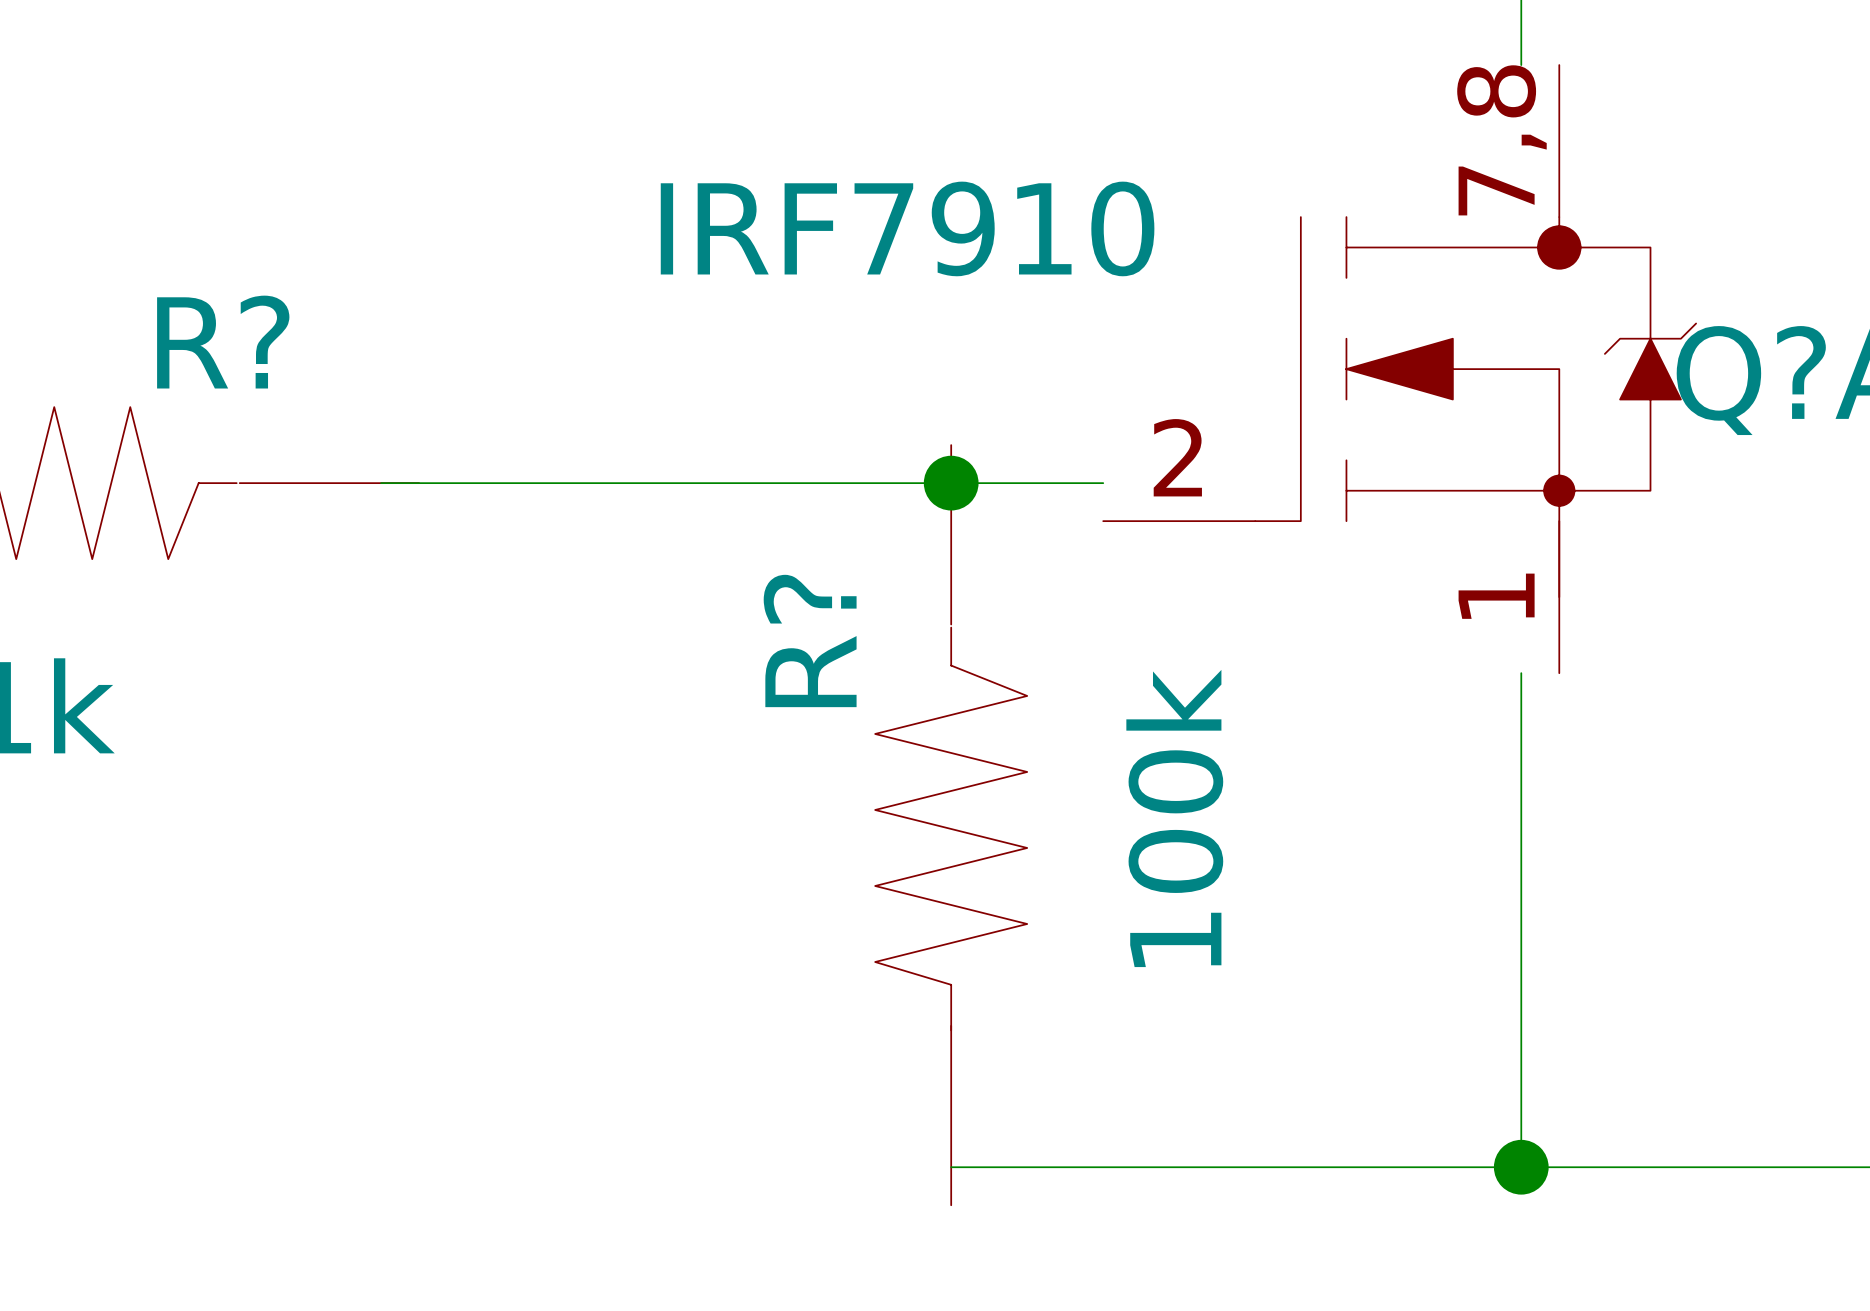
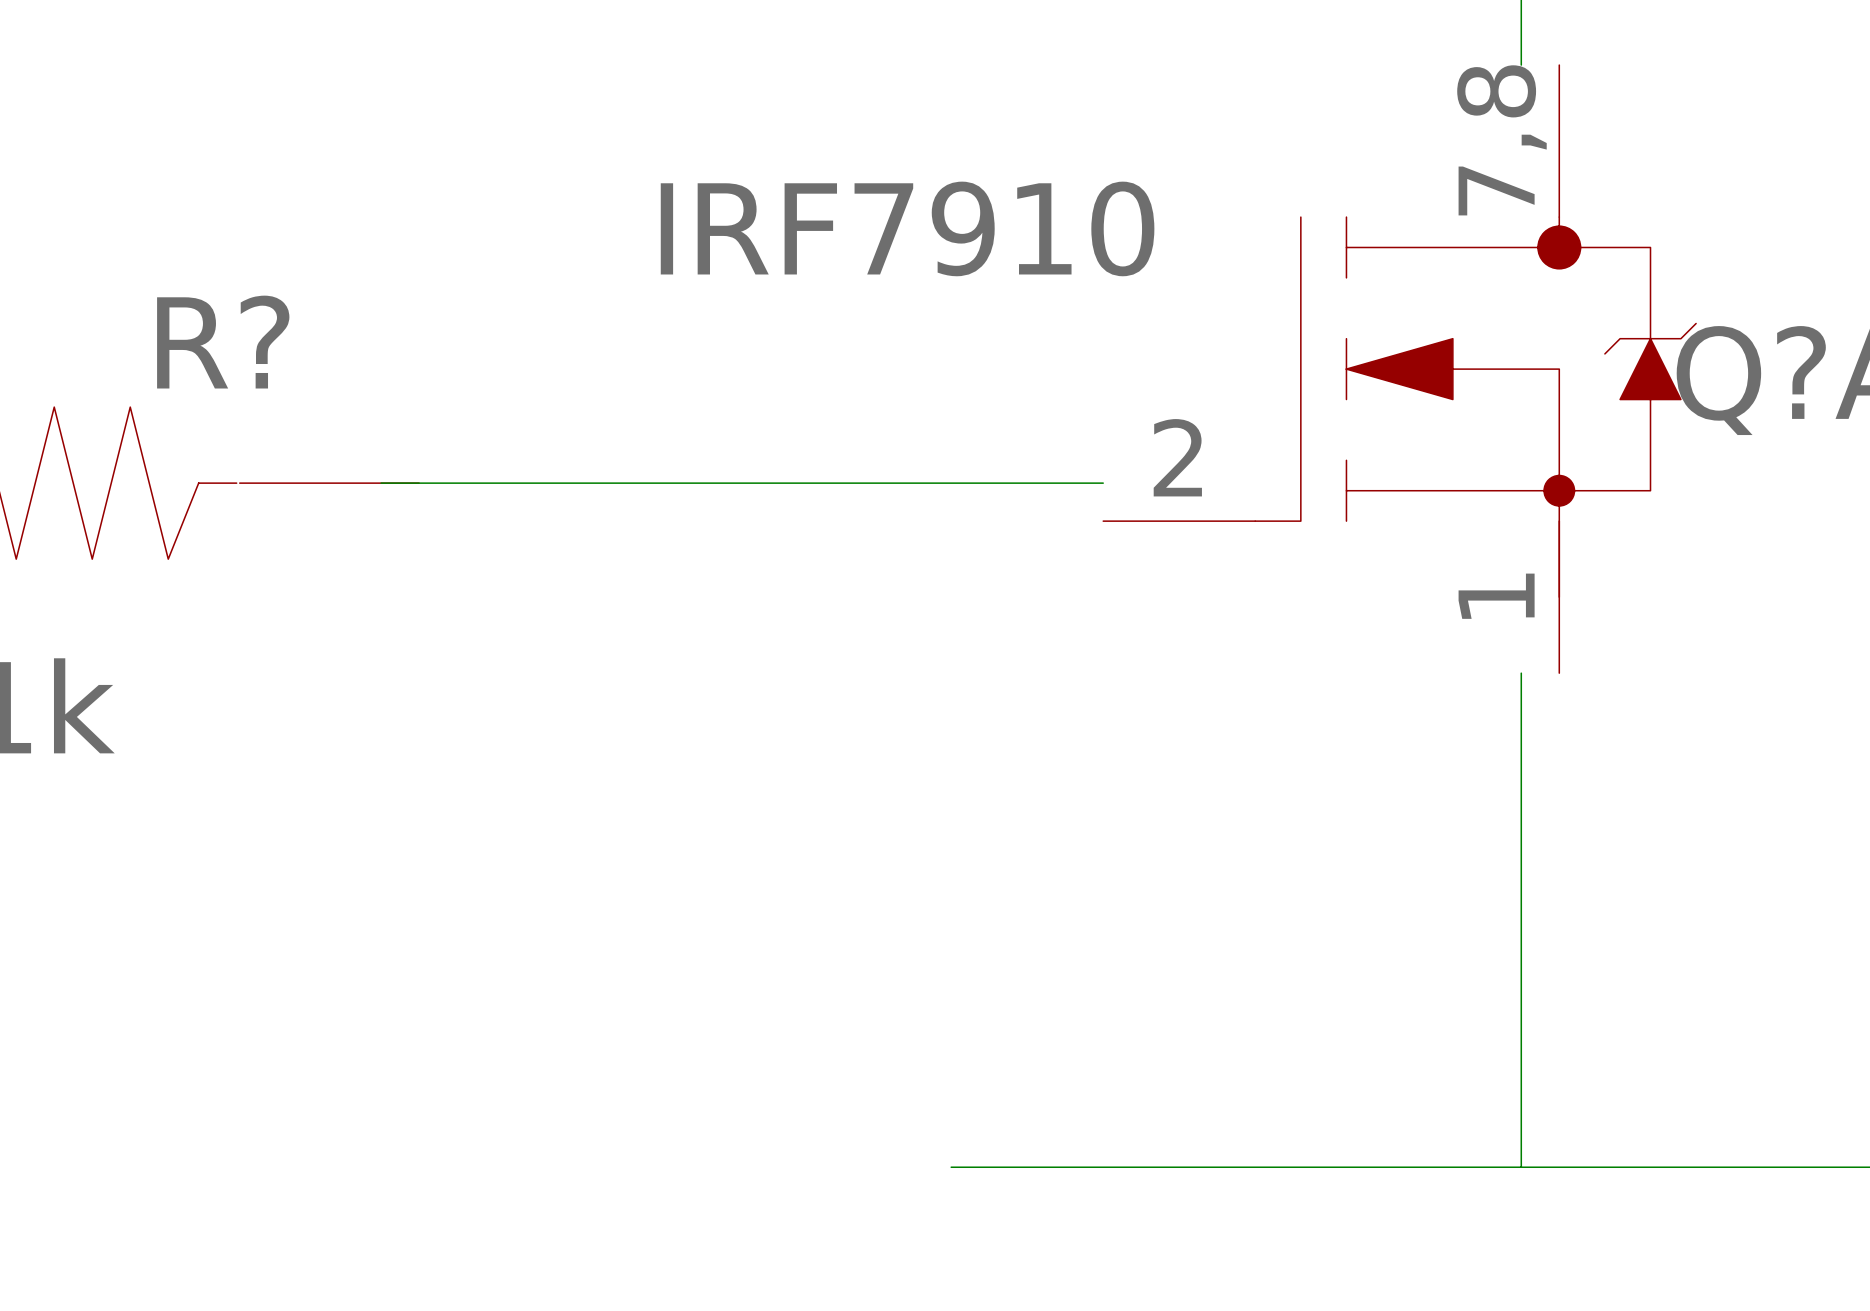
junction: (951, 483) -> none
R?: 100k (951, 825) -> none
junction: (1521, 1167) -> none

